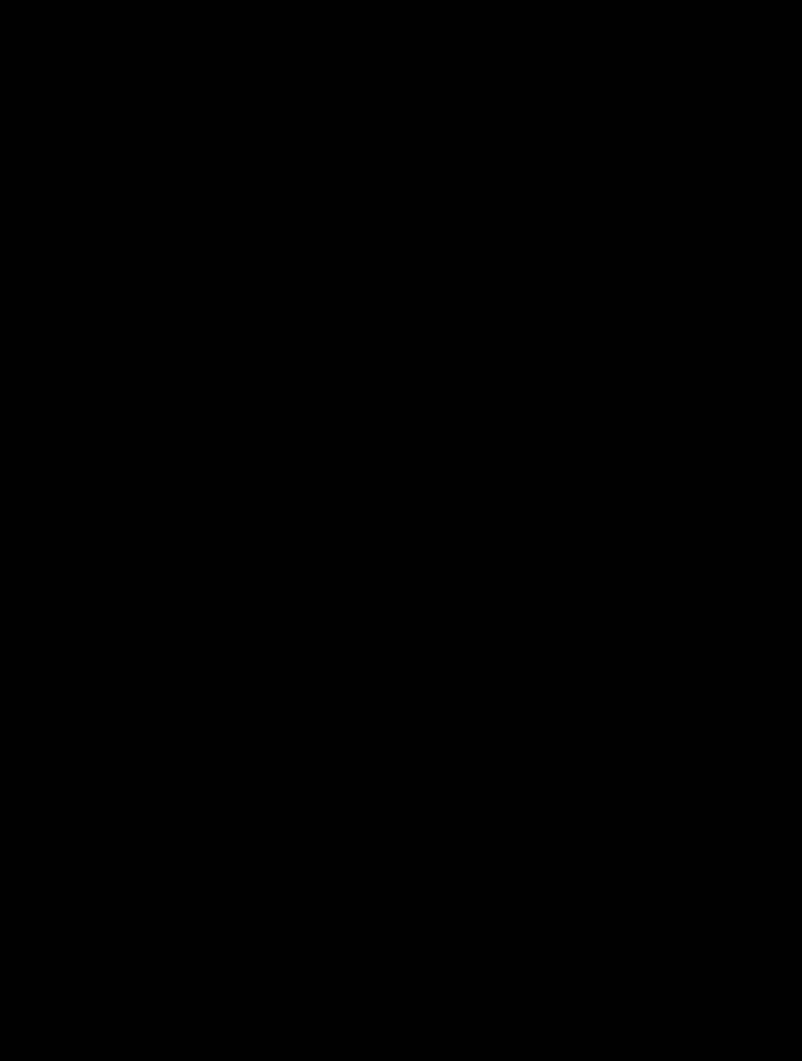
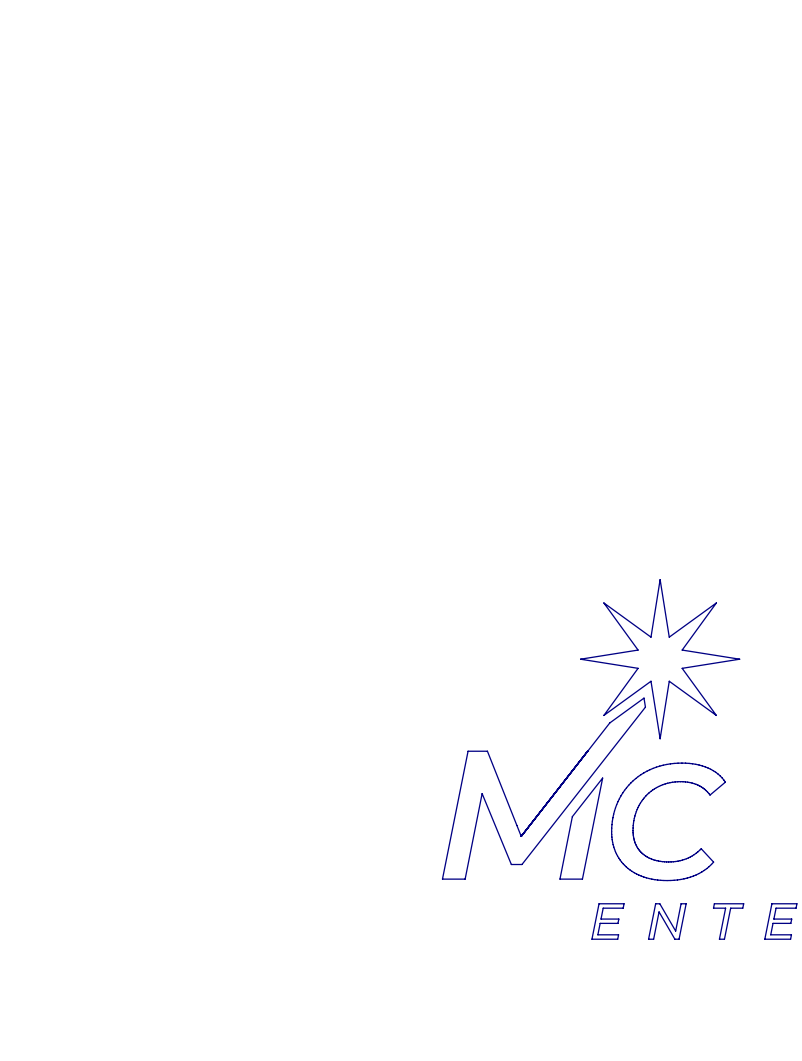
line: none -> (660, 579) (650, 637) (603, 602) (638, 650) (580, 659) (638, 668) (603, 715) (650, 681) (660, 738) (669, 681) (716, 715) (682, 668) (739, 659) (682, 650) (716, 602) (669, 637) (660, 579)
line: none -> (681, 763) (659, 766) (641, 774) (626, 787) (615, 807) (611, 831) (615, 851) (626, 866) (643, 877) (663, 880) (684, 878) (701, 872) (713, 862) (701, 848) (682, 860) (668, 861) (656, 860) (643, 854) (634, 841) (633, 827) (636, 811) (644, 797) (654, 788) (670, 782) (685, 781) (699, 786) (710, 795) (725, 782) (717, 773) (708, 767) (681, 763)
line: none -> (602, 778) (572, 816) (559, 879) (582, 879) (602, 778)
line: none -> (521, 836) (487, 751) (468, 751) (442, 879) (465, 879) (482, 793) (511, 864) (521, 864) (645, 707) (644, 698) (609, 722) (521, 836)
line: none -> (599, 903) (624, 903) (623, 908) (603, 908) (601, 919) (618, 919) (617, 923) (600, 923) (597, 934) (618, 934) (617, 939) (591, 939) (599, 903)
line: none -> (655, 903) (659, 903) (675, 931) (681, 903) (686, 903) (679, 939) (674, 939) (659, 911) (653, 939) (648, 939) (655, 903)
line: none -> (714, 903) (743, 903) (742, 908) (730, 908) (724, 939) (719, 939) (725, 908) (713, 908) (714, 903)
line: none -> (771, 903) (764, 939) (790, 939) (791, 934) (770, 934) (773, 923) (790, 923) (791, 919) (773, 919) (776, 908) (796, 908) (796, 903) (771, 903)

